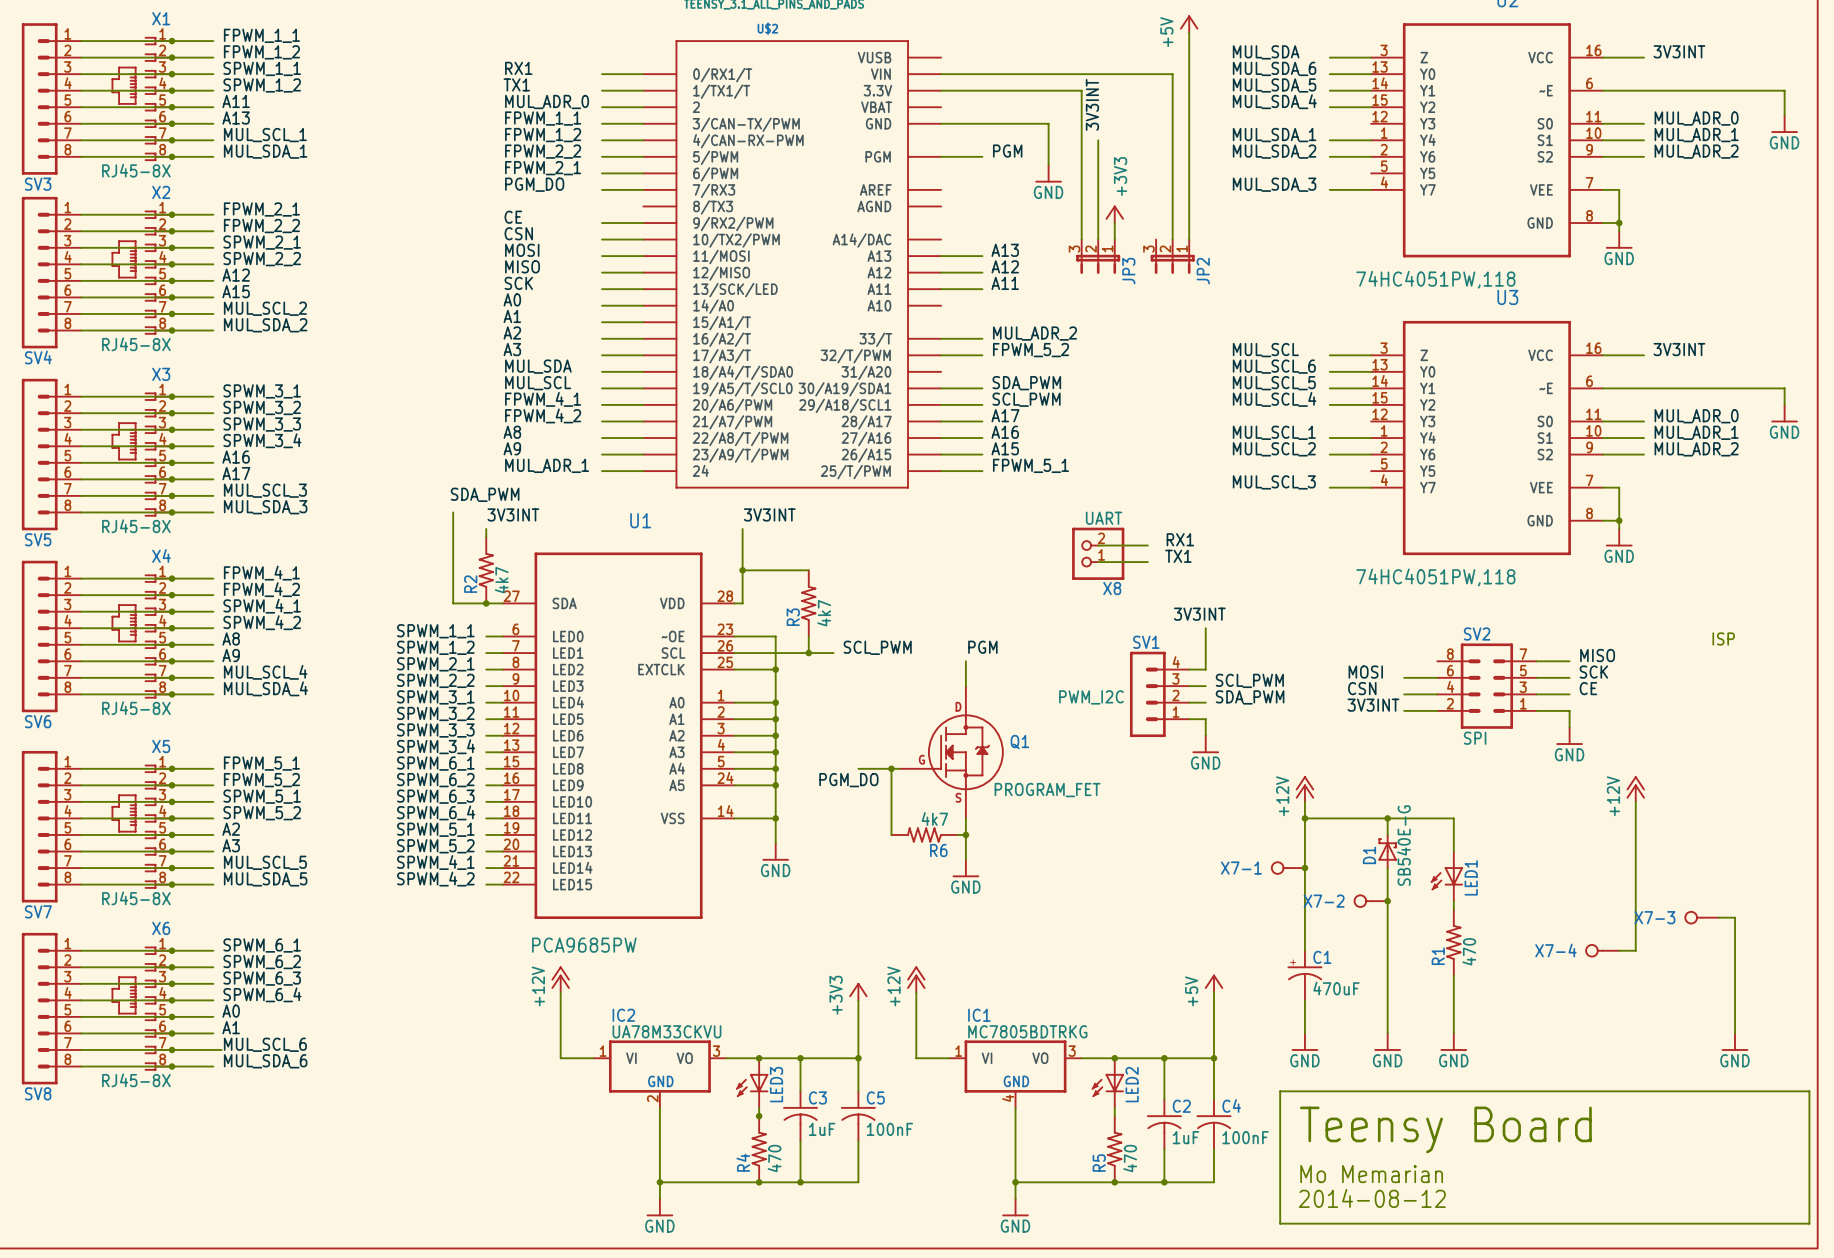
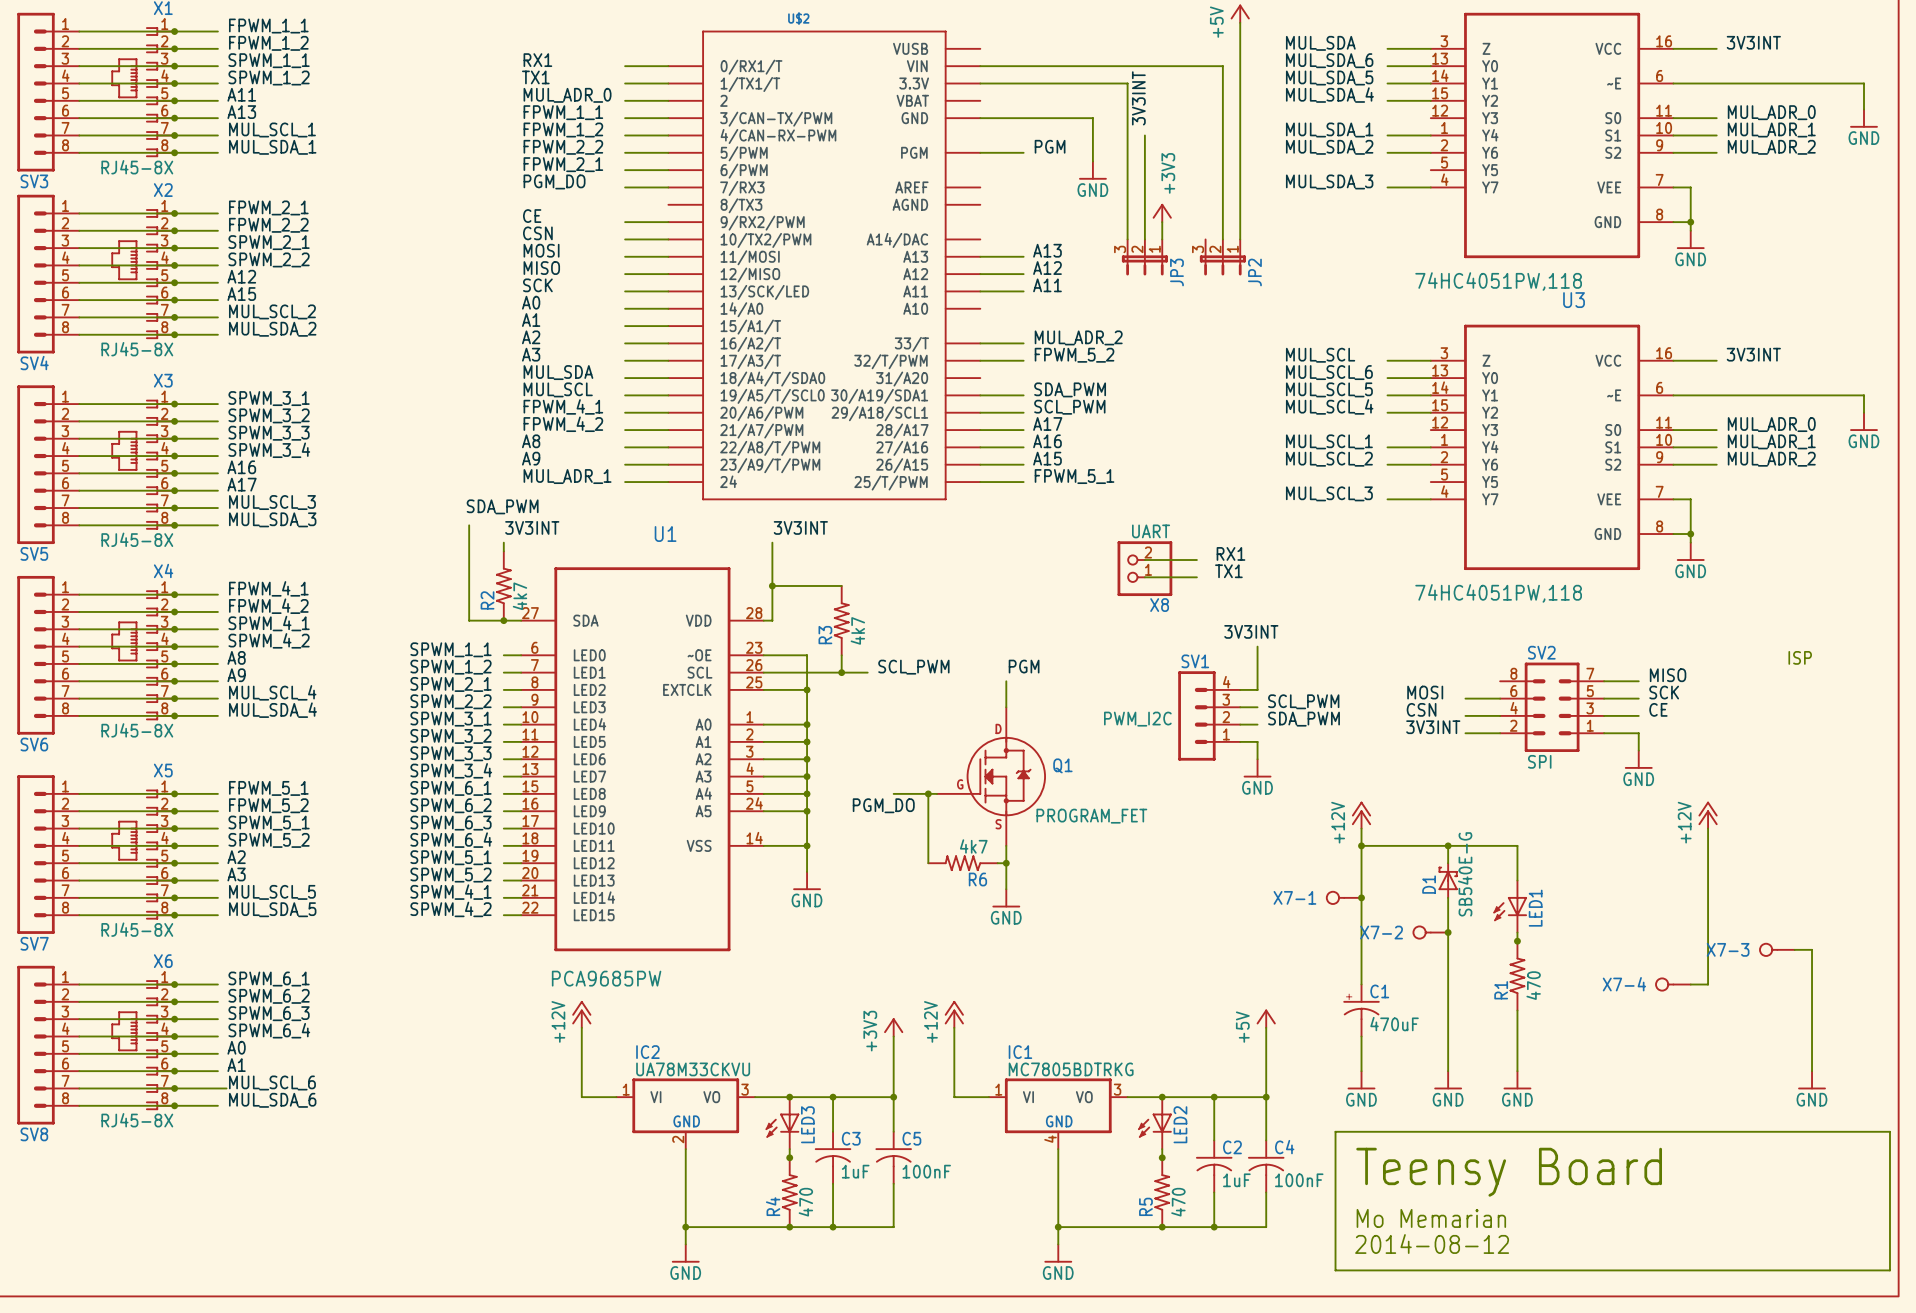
junction: none -> (1517, 941)
junction: none -> (1162, 1157)

